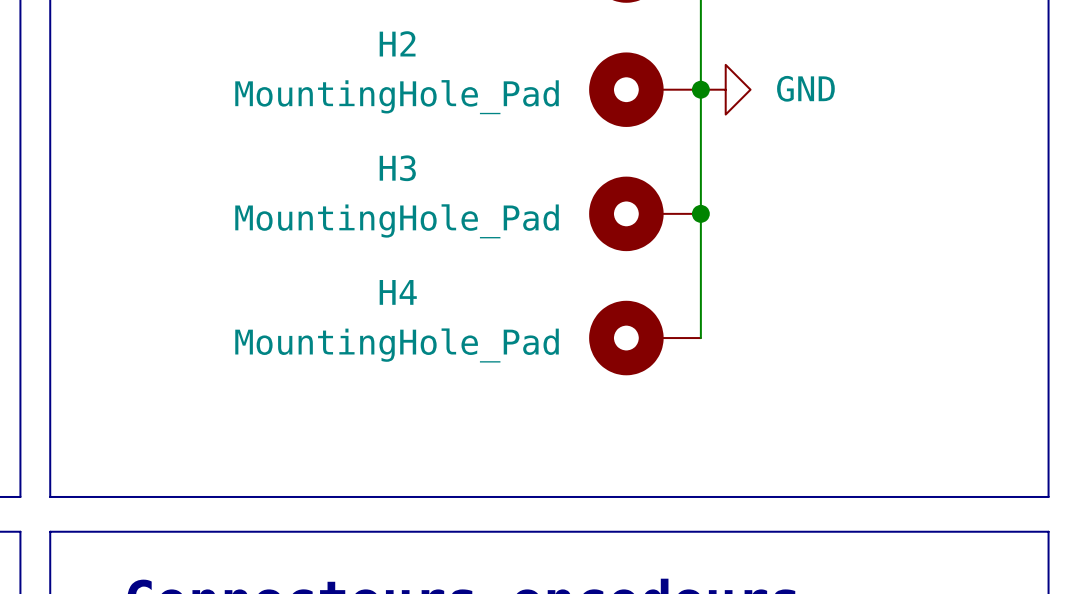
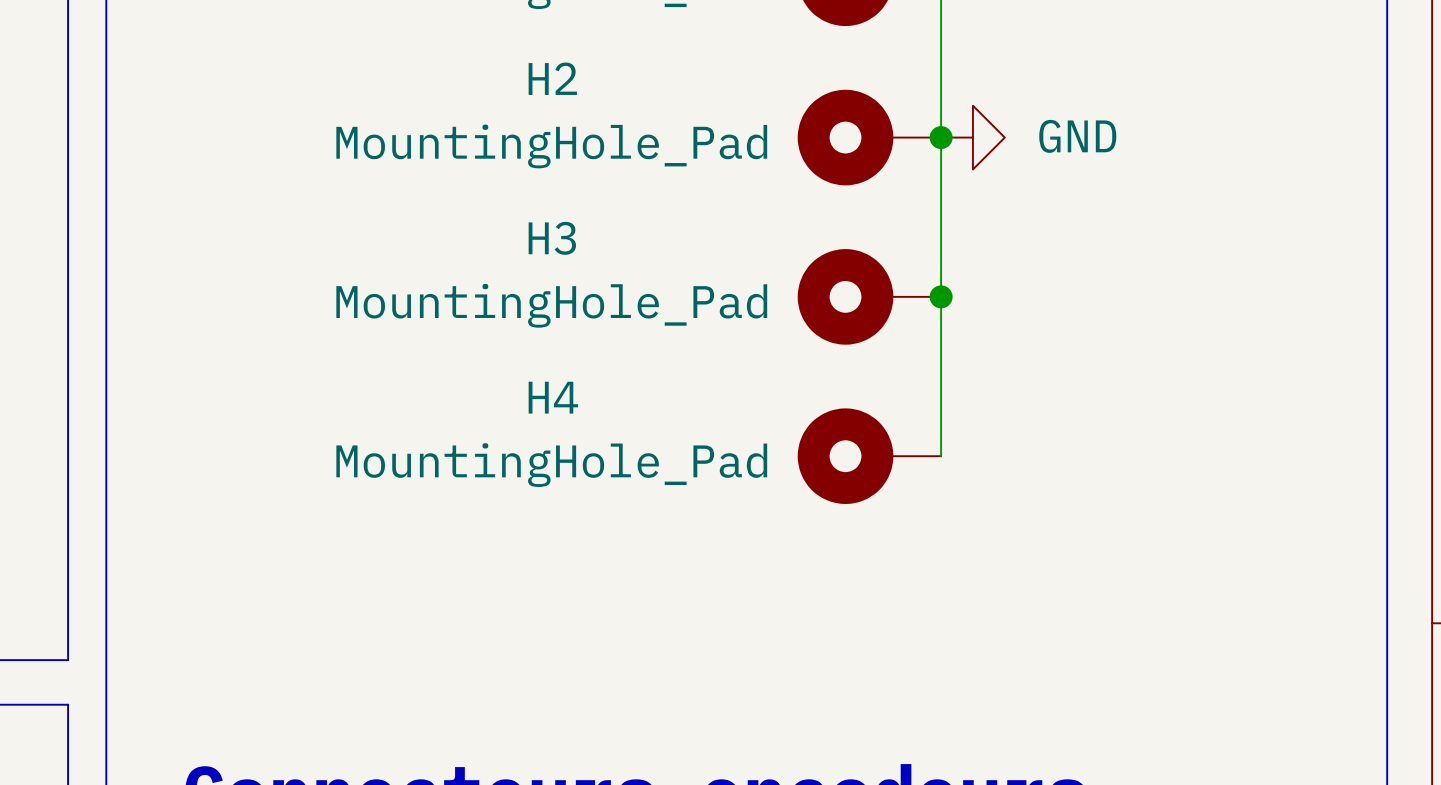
line: (50, 496) (1048, 496) -> (106, 660) (106, 704)
line: (50, 531) (1048, 531) -> (1387, 660) (1387, 704)

